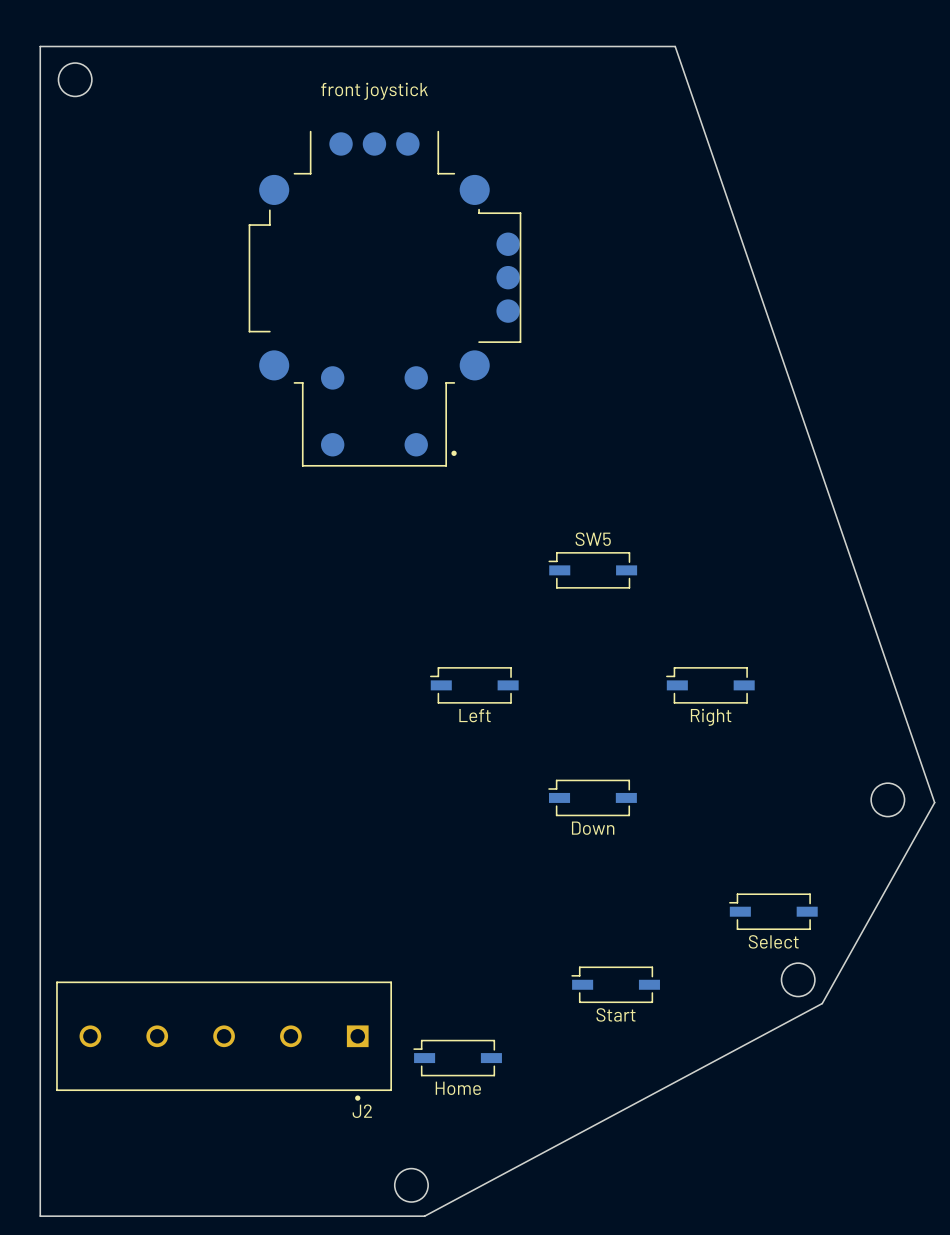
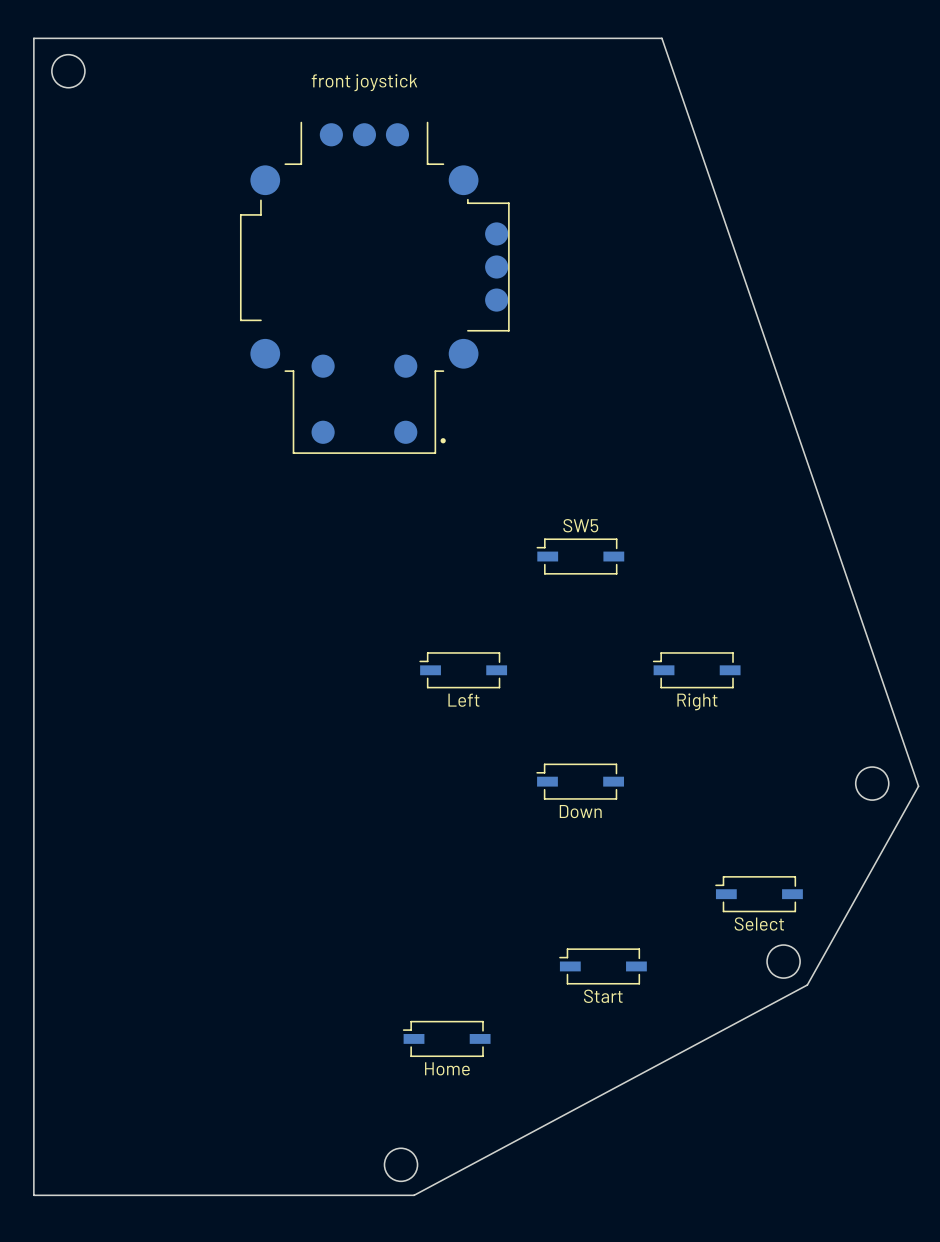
J2: (224, 1041) -> none

